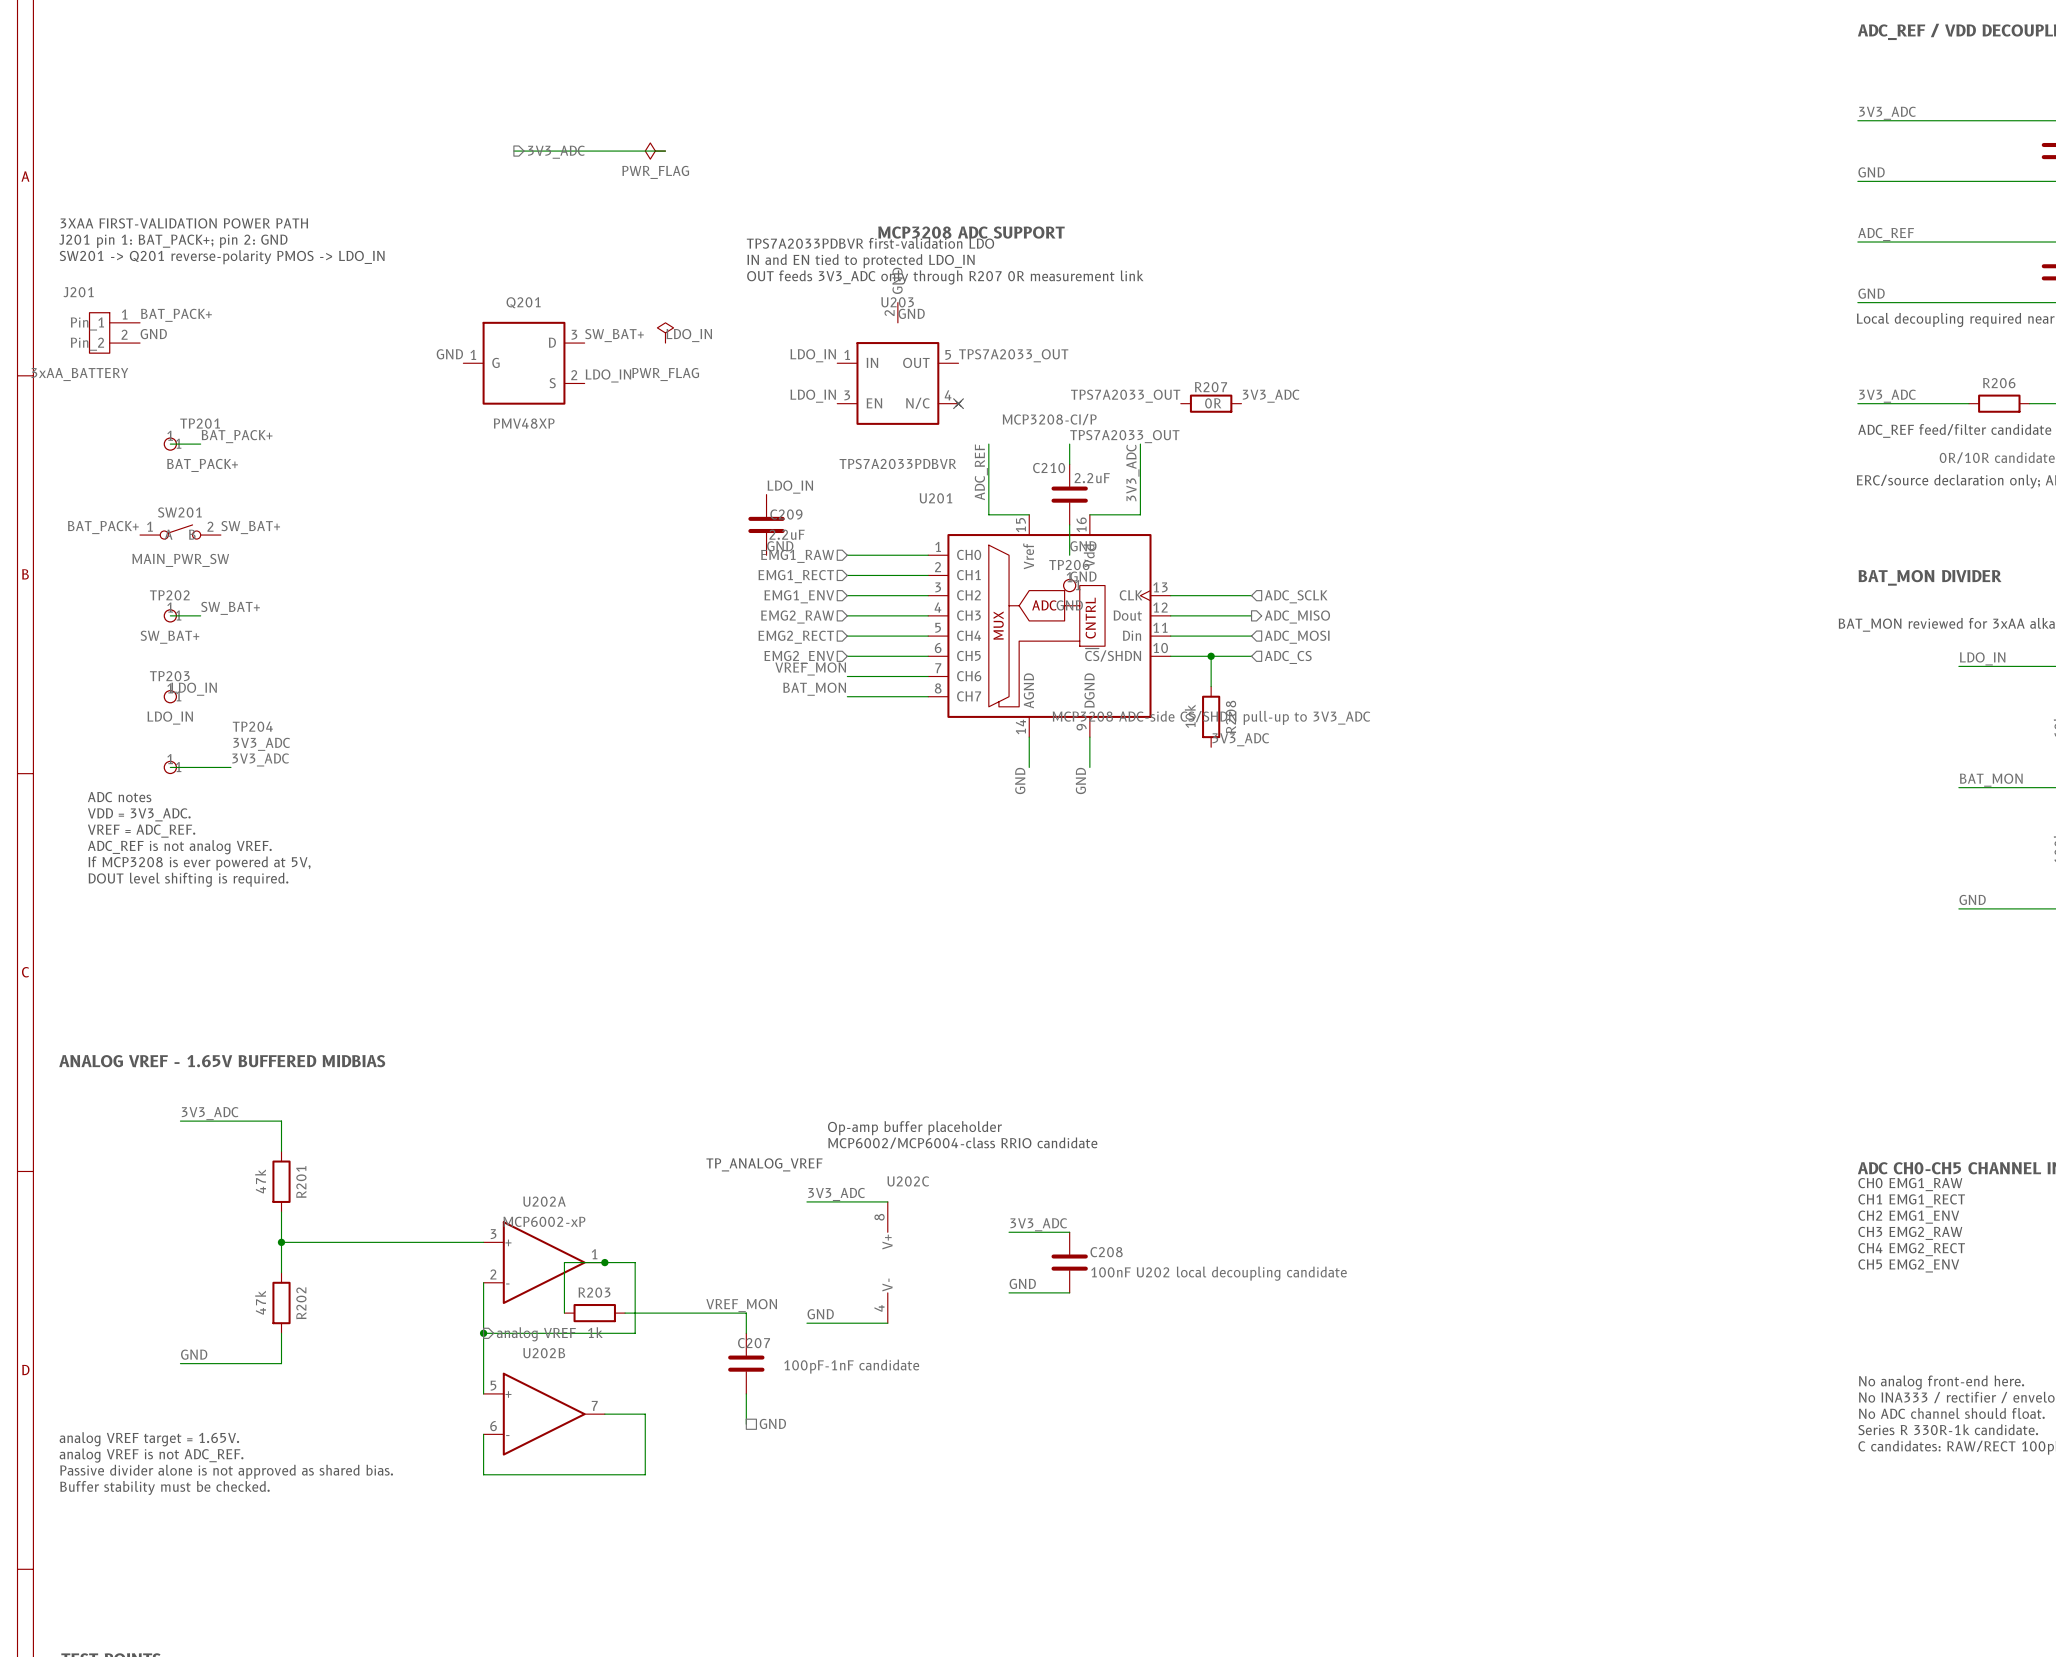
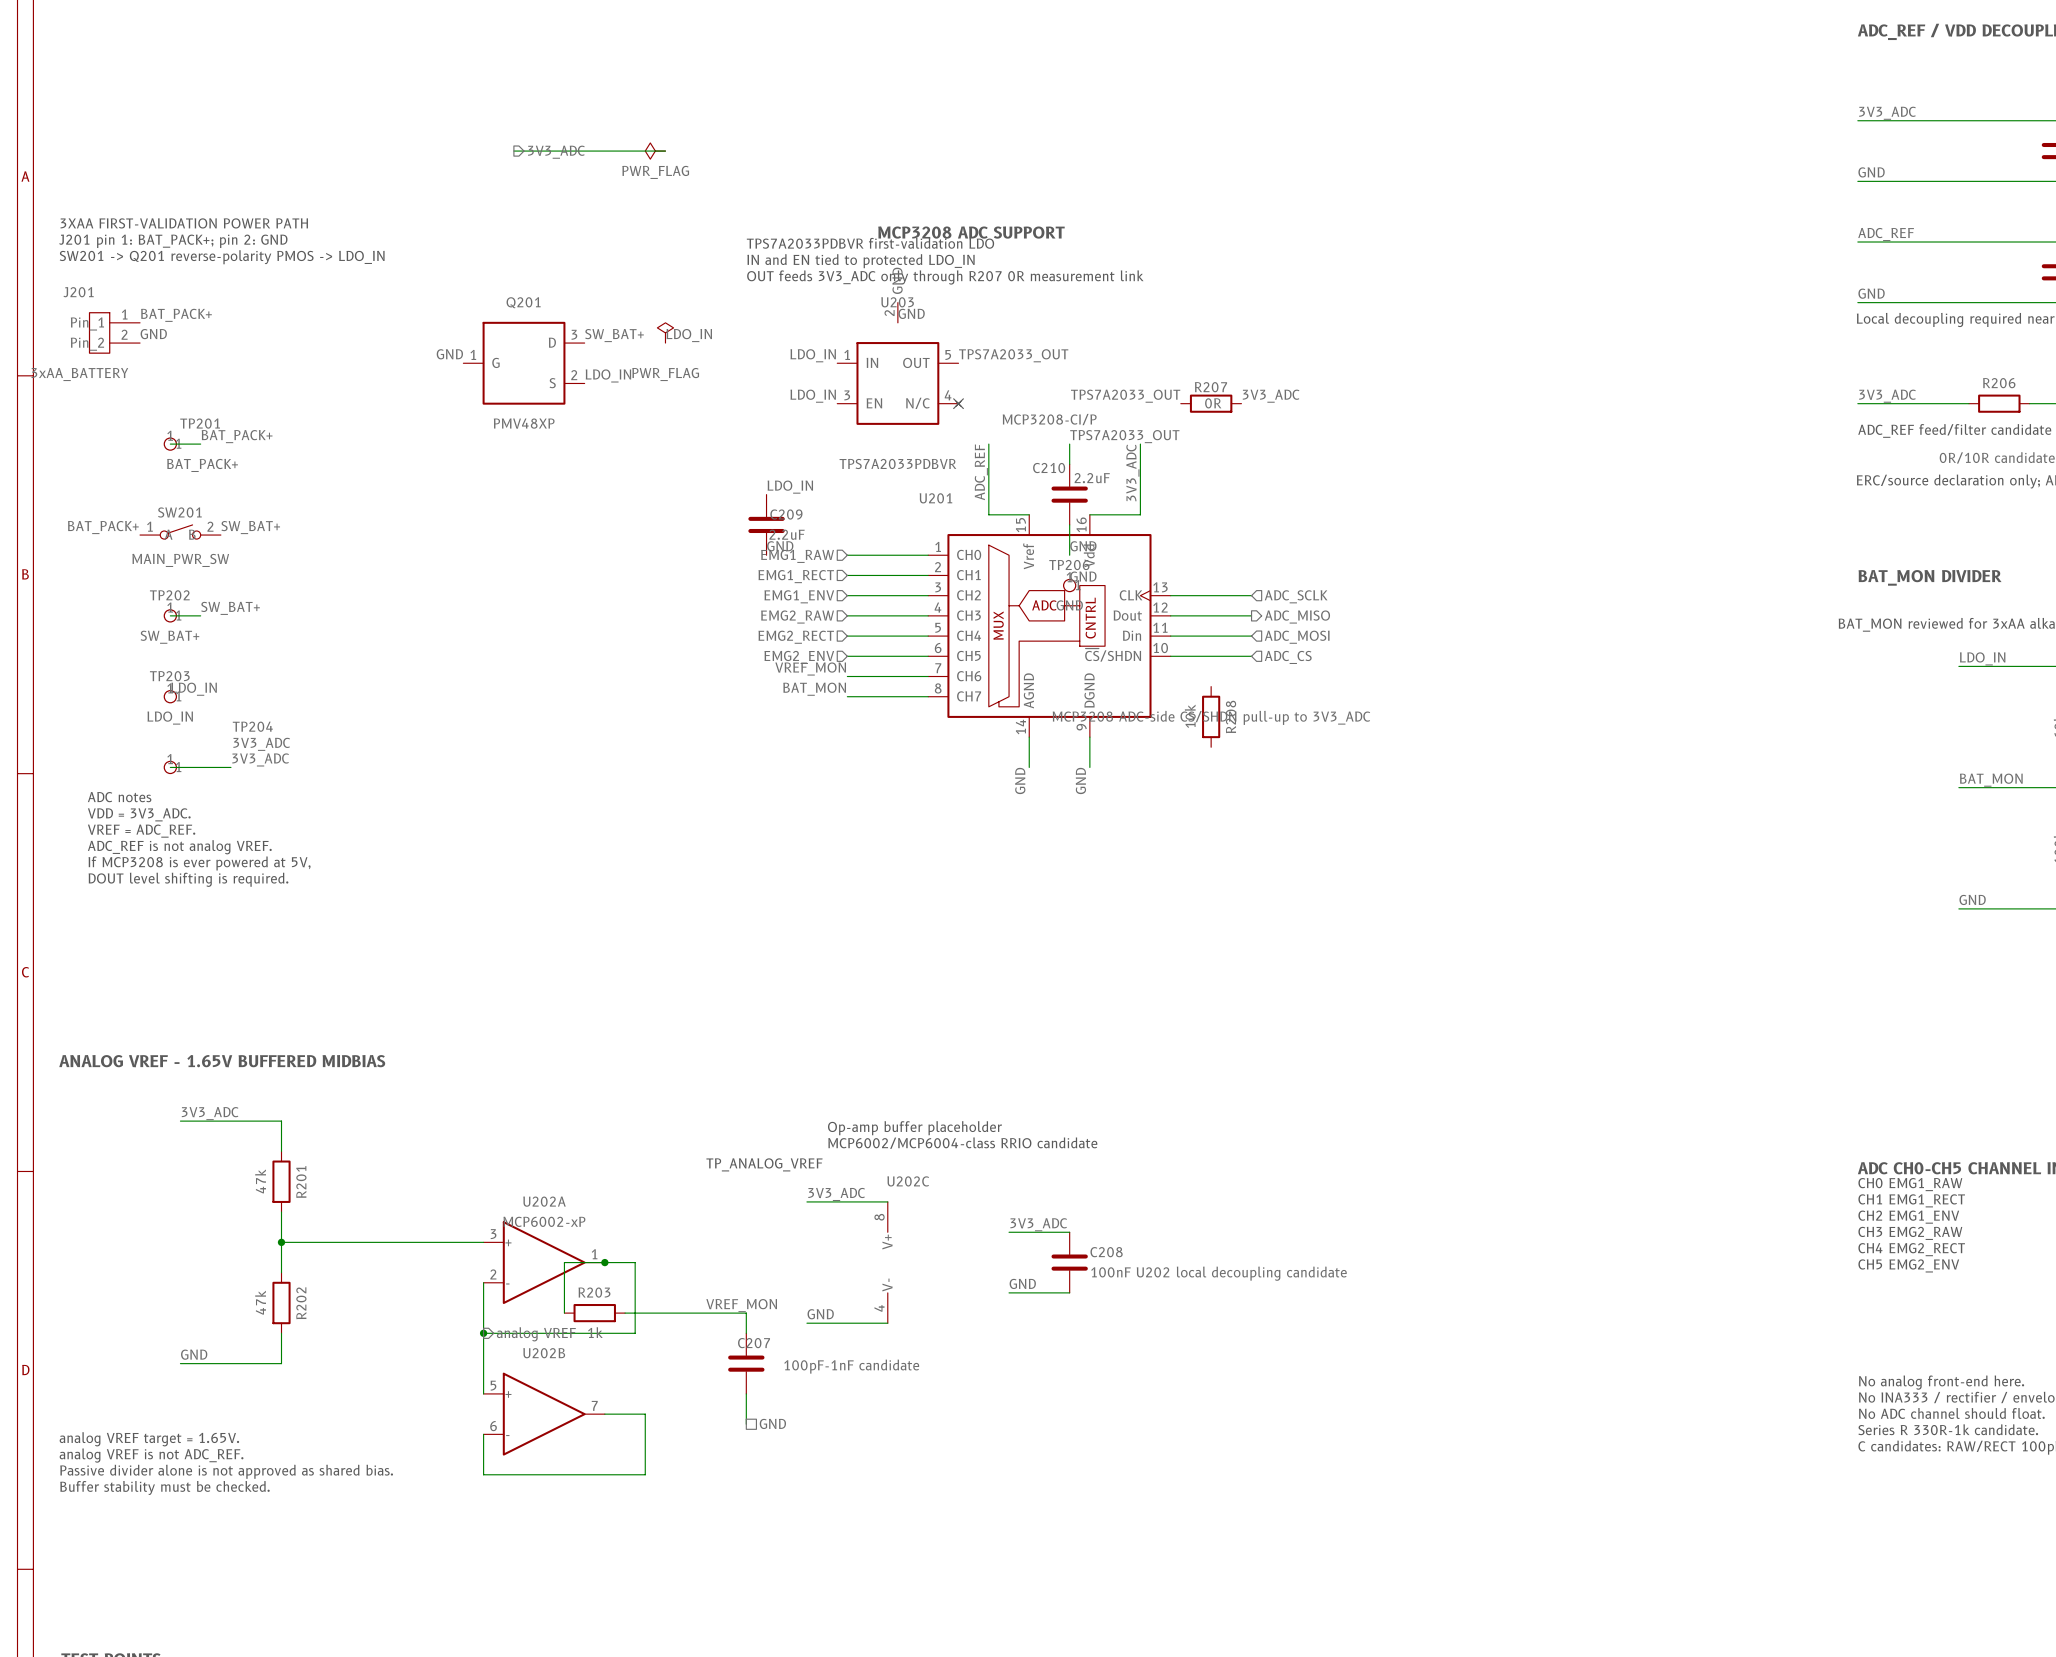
wire: (1211, 656) (1211, 686) -> none
junction: (1211, 656) -> none
label: 3V3_ADC (1240, 739) -> none

